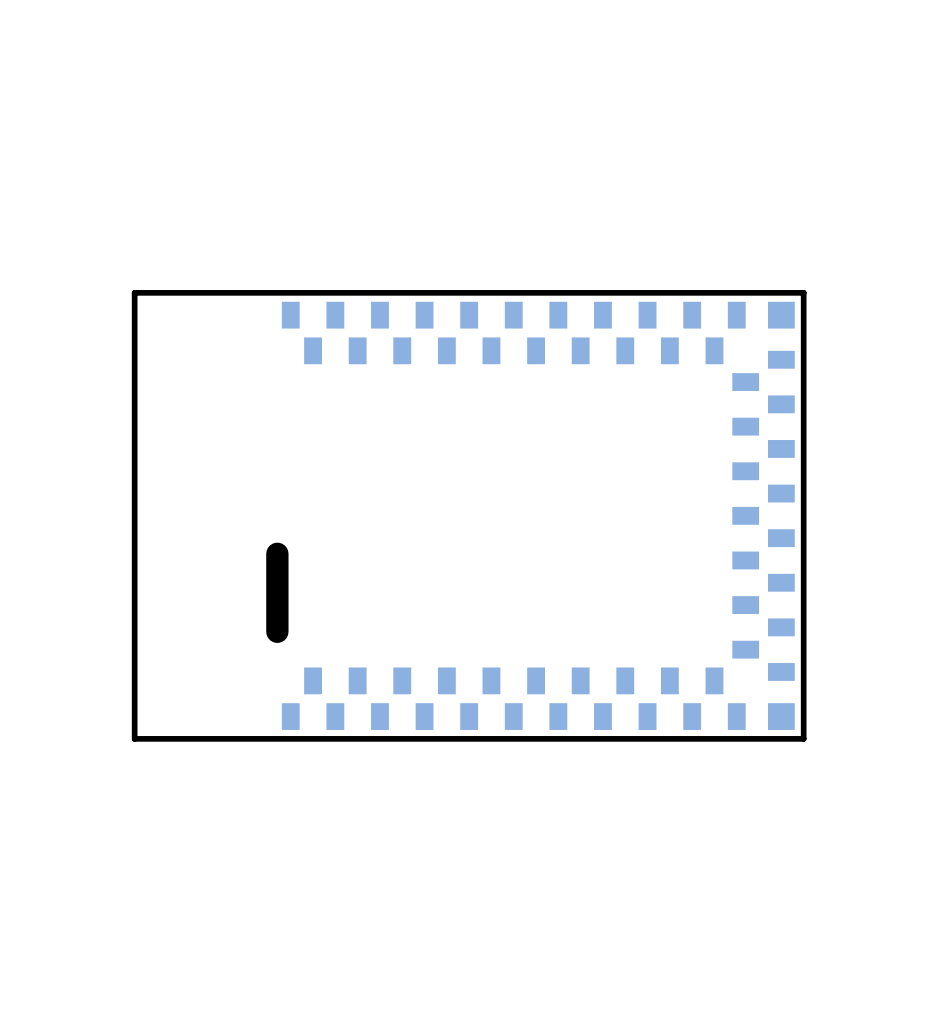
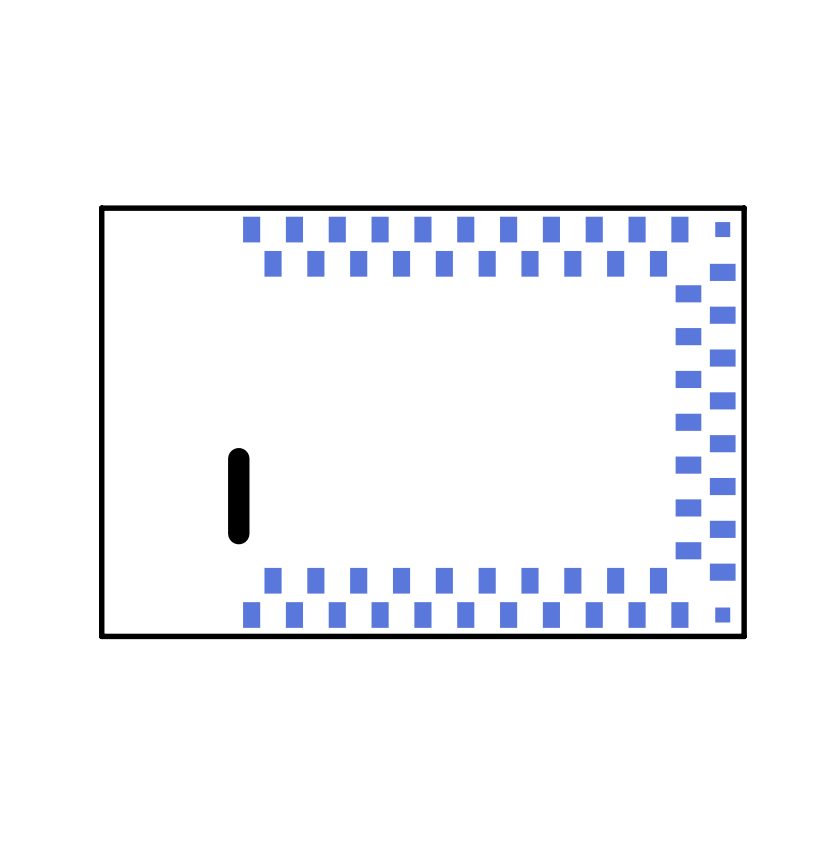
part footprint: [767, 301, 795, 329] -> [715, 222, 731, 238]
part footprint: [767, 703, 795, 730] -> [715, 607, 731, 623]

